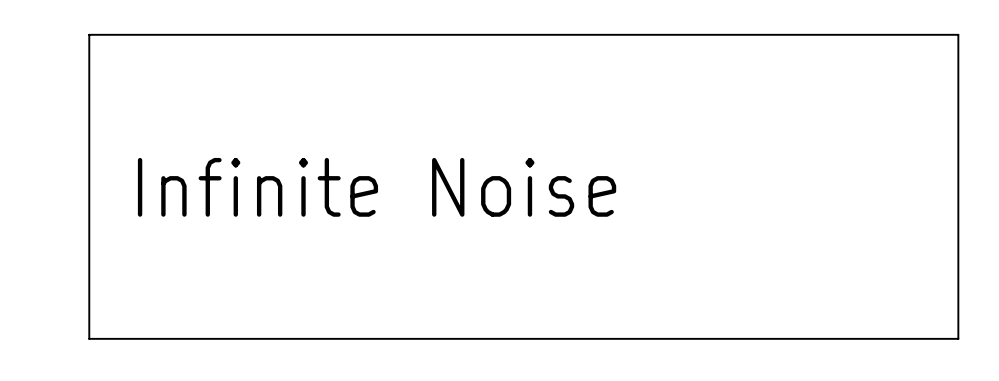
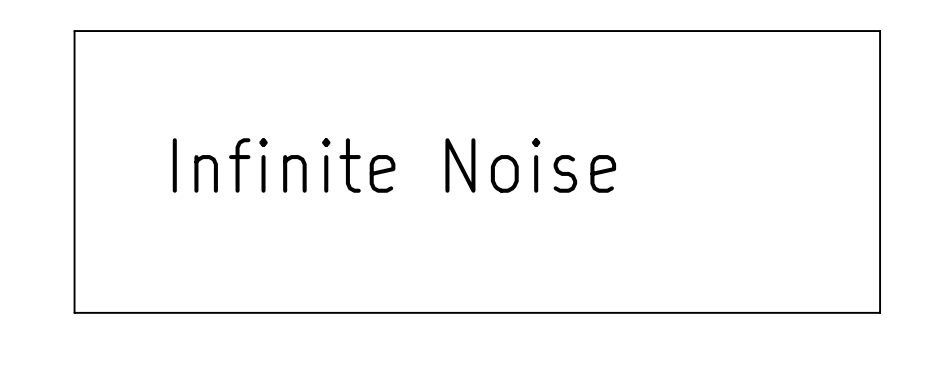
text position: Infinite Noise (377, 187) -> Infinite Noise (394, 165)

